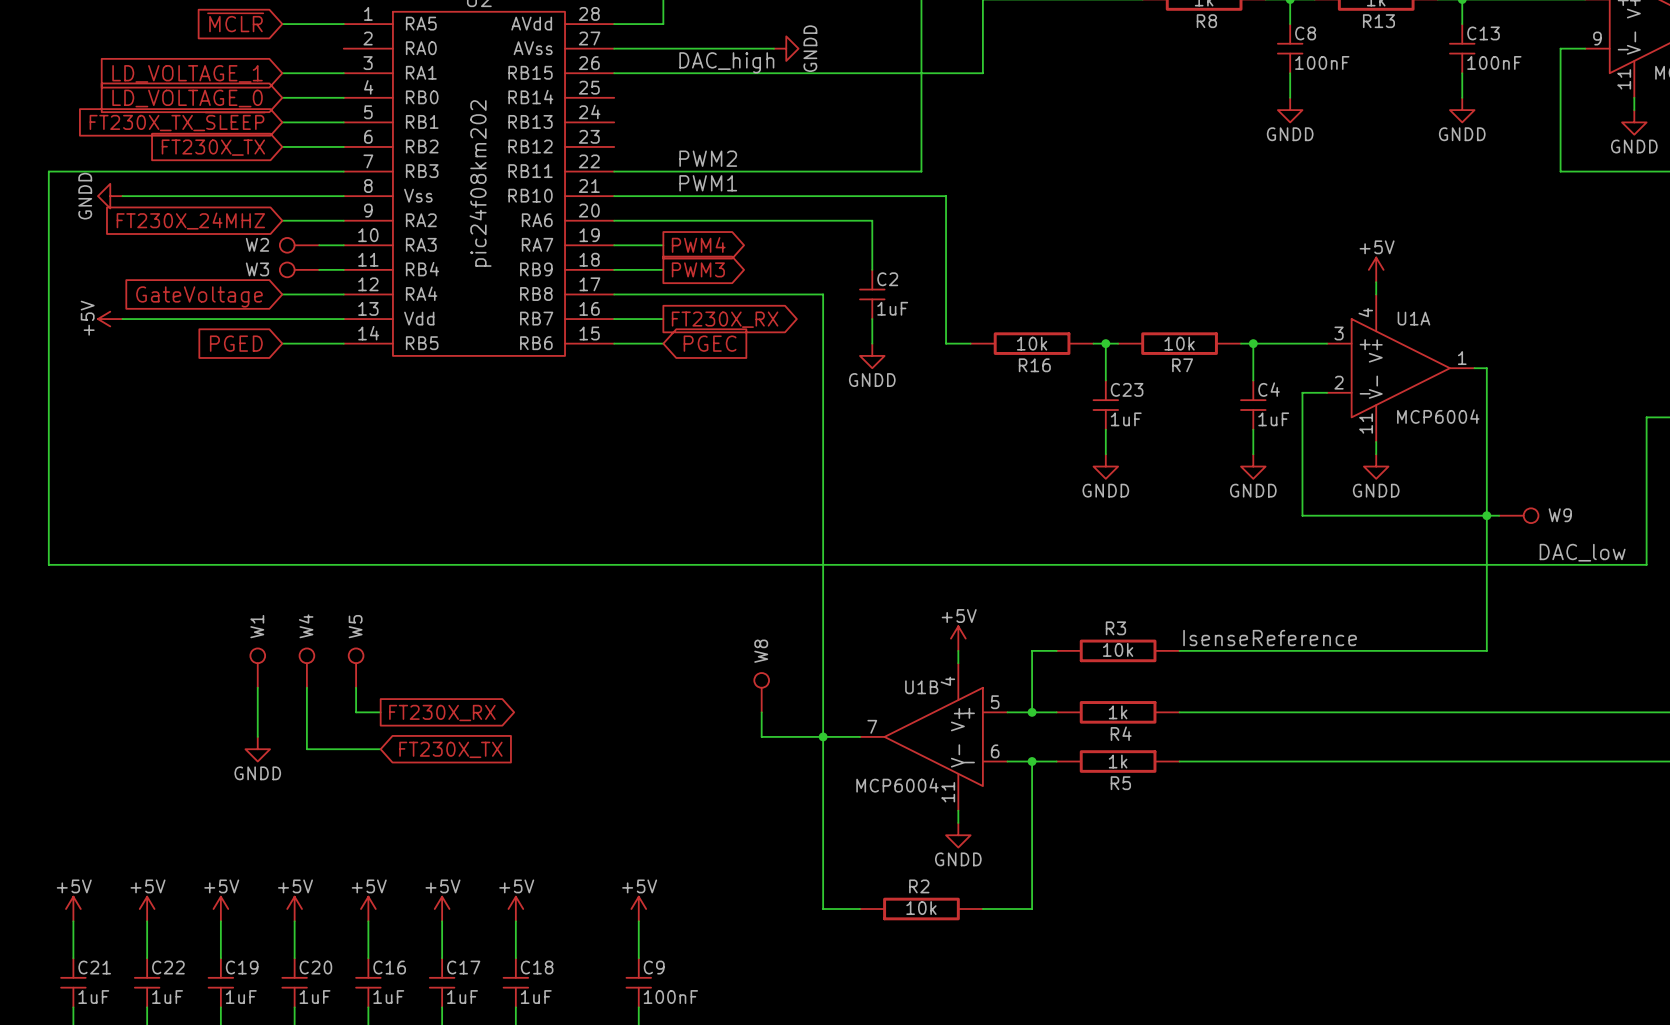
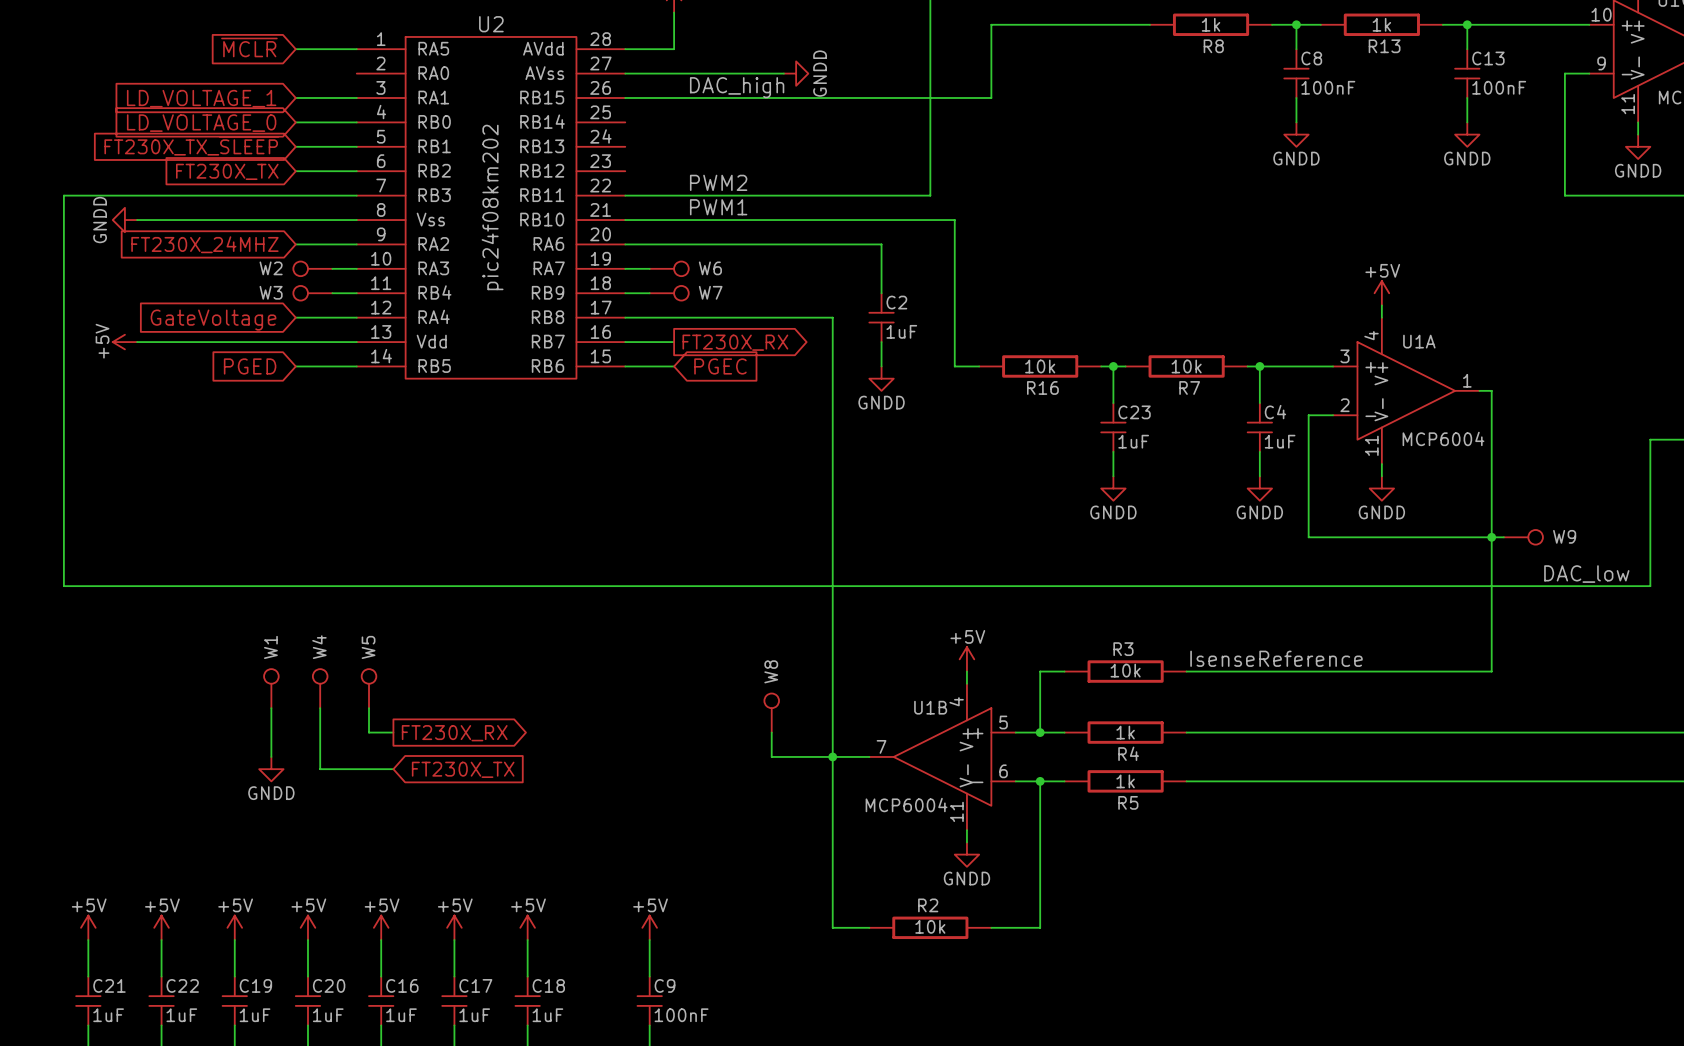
global label: PWM4 (698, 244) -> none
W6: none -> (669, 268)
W7: none -> (669, 293)
global label: PWM3 (698, 269) -> none

